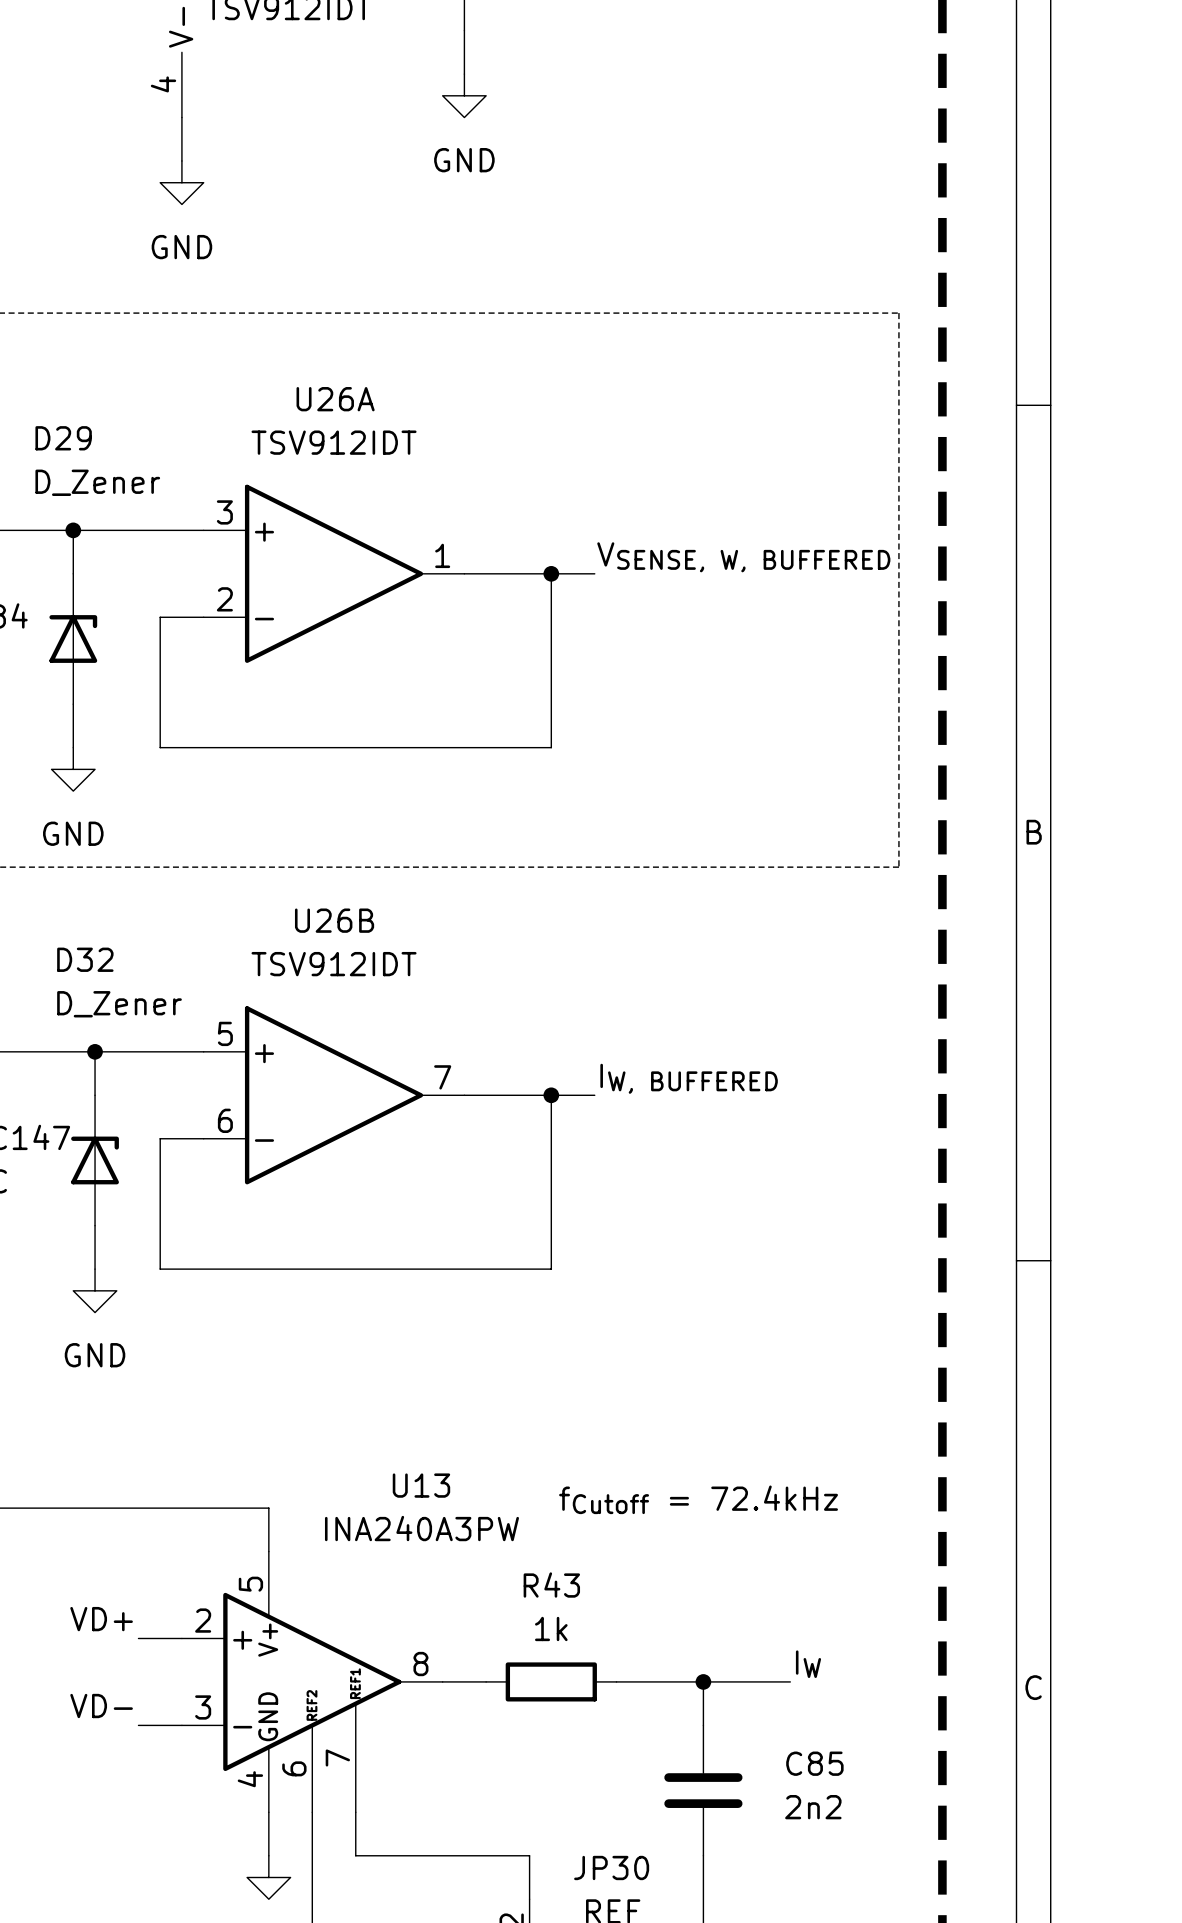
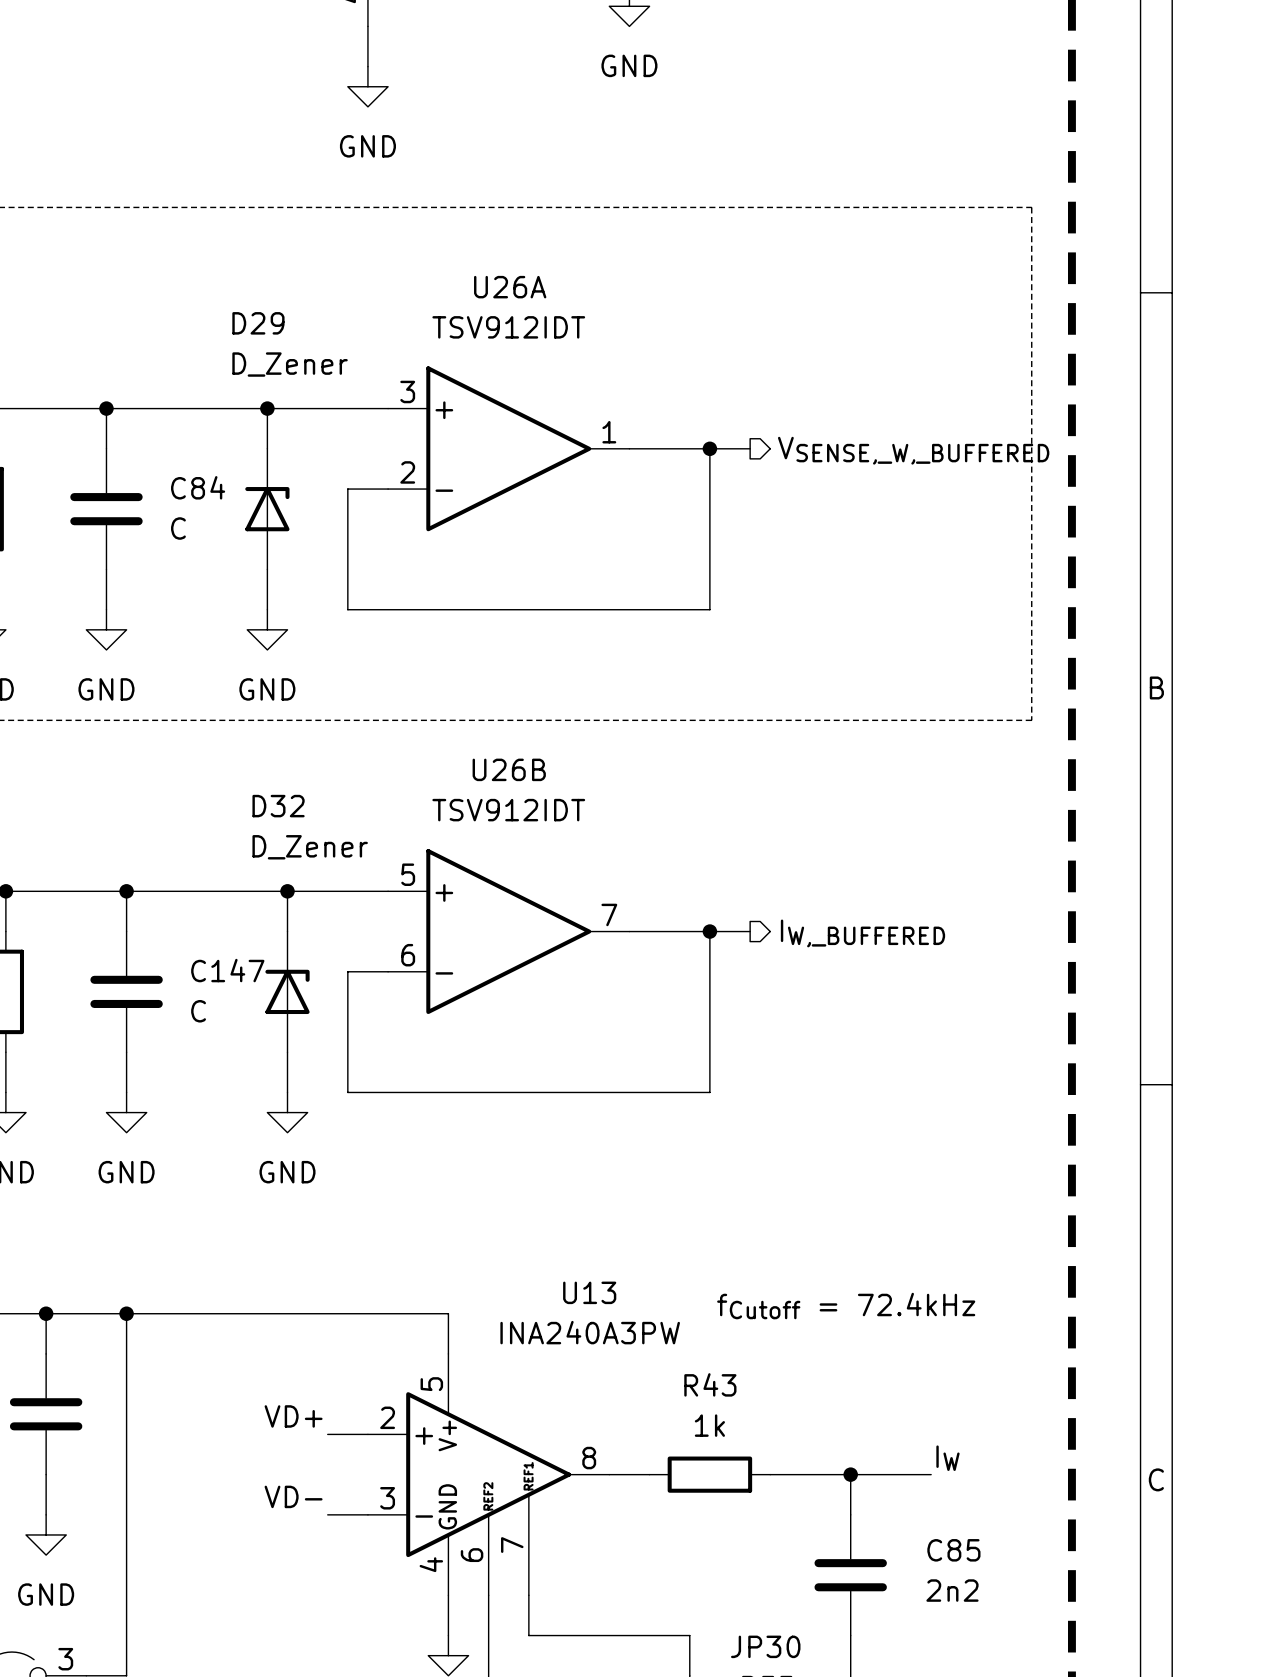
label: VSENSE, W, BUFFERED (743, 557) -> none
hierarchical label: none -> VSENSE,_W,_BUFFERED (913, 450)
label: IW, BUFFERED (689, 1078) -> none
hierarchical label: none -> IW,_BUFFERED (862, 933)

